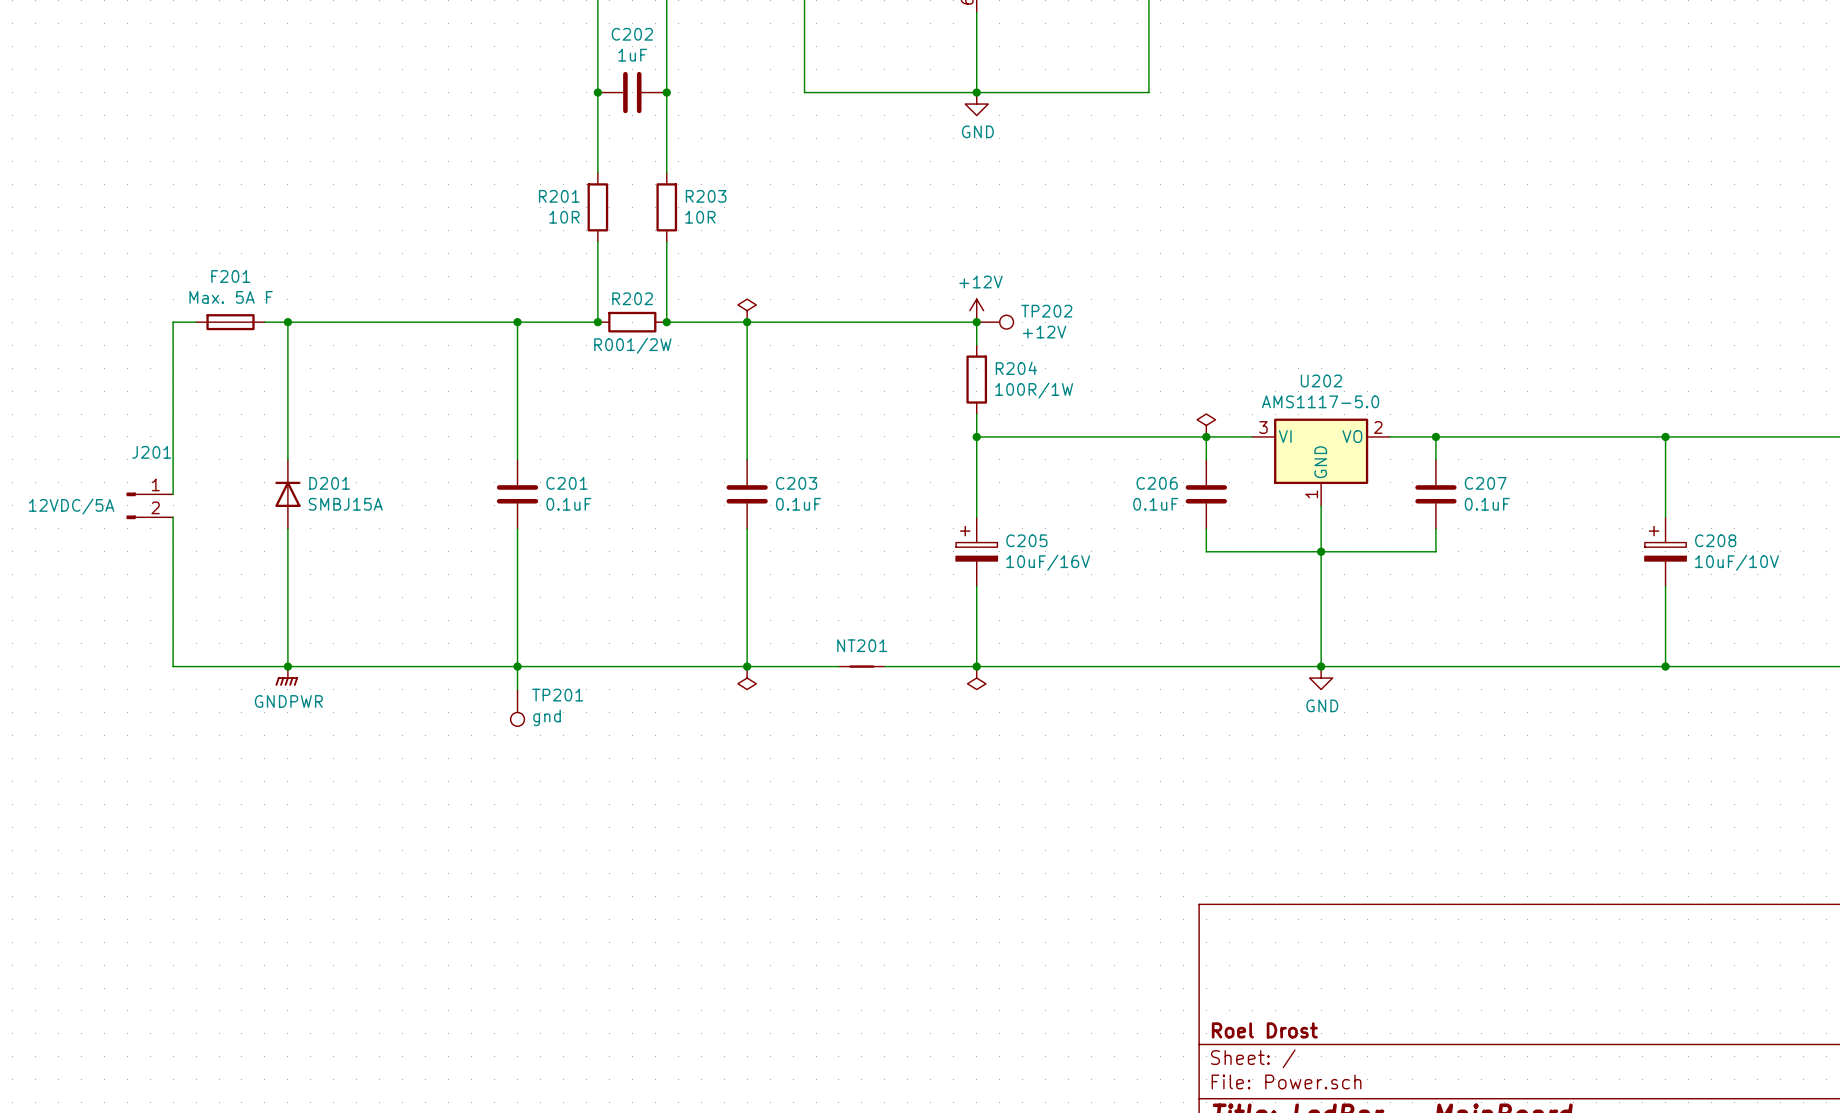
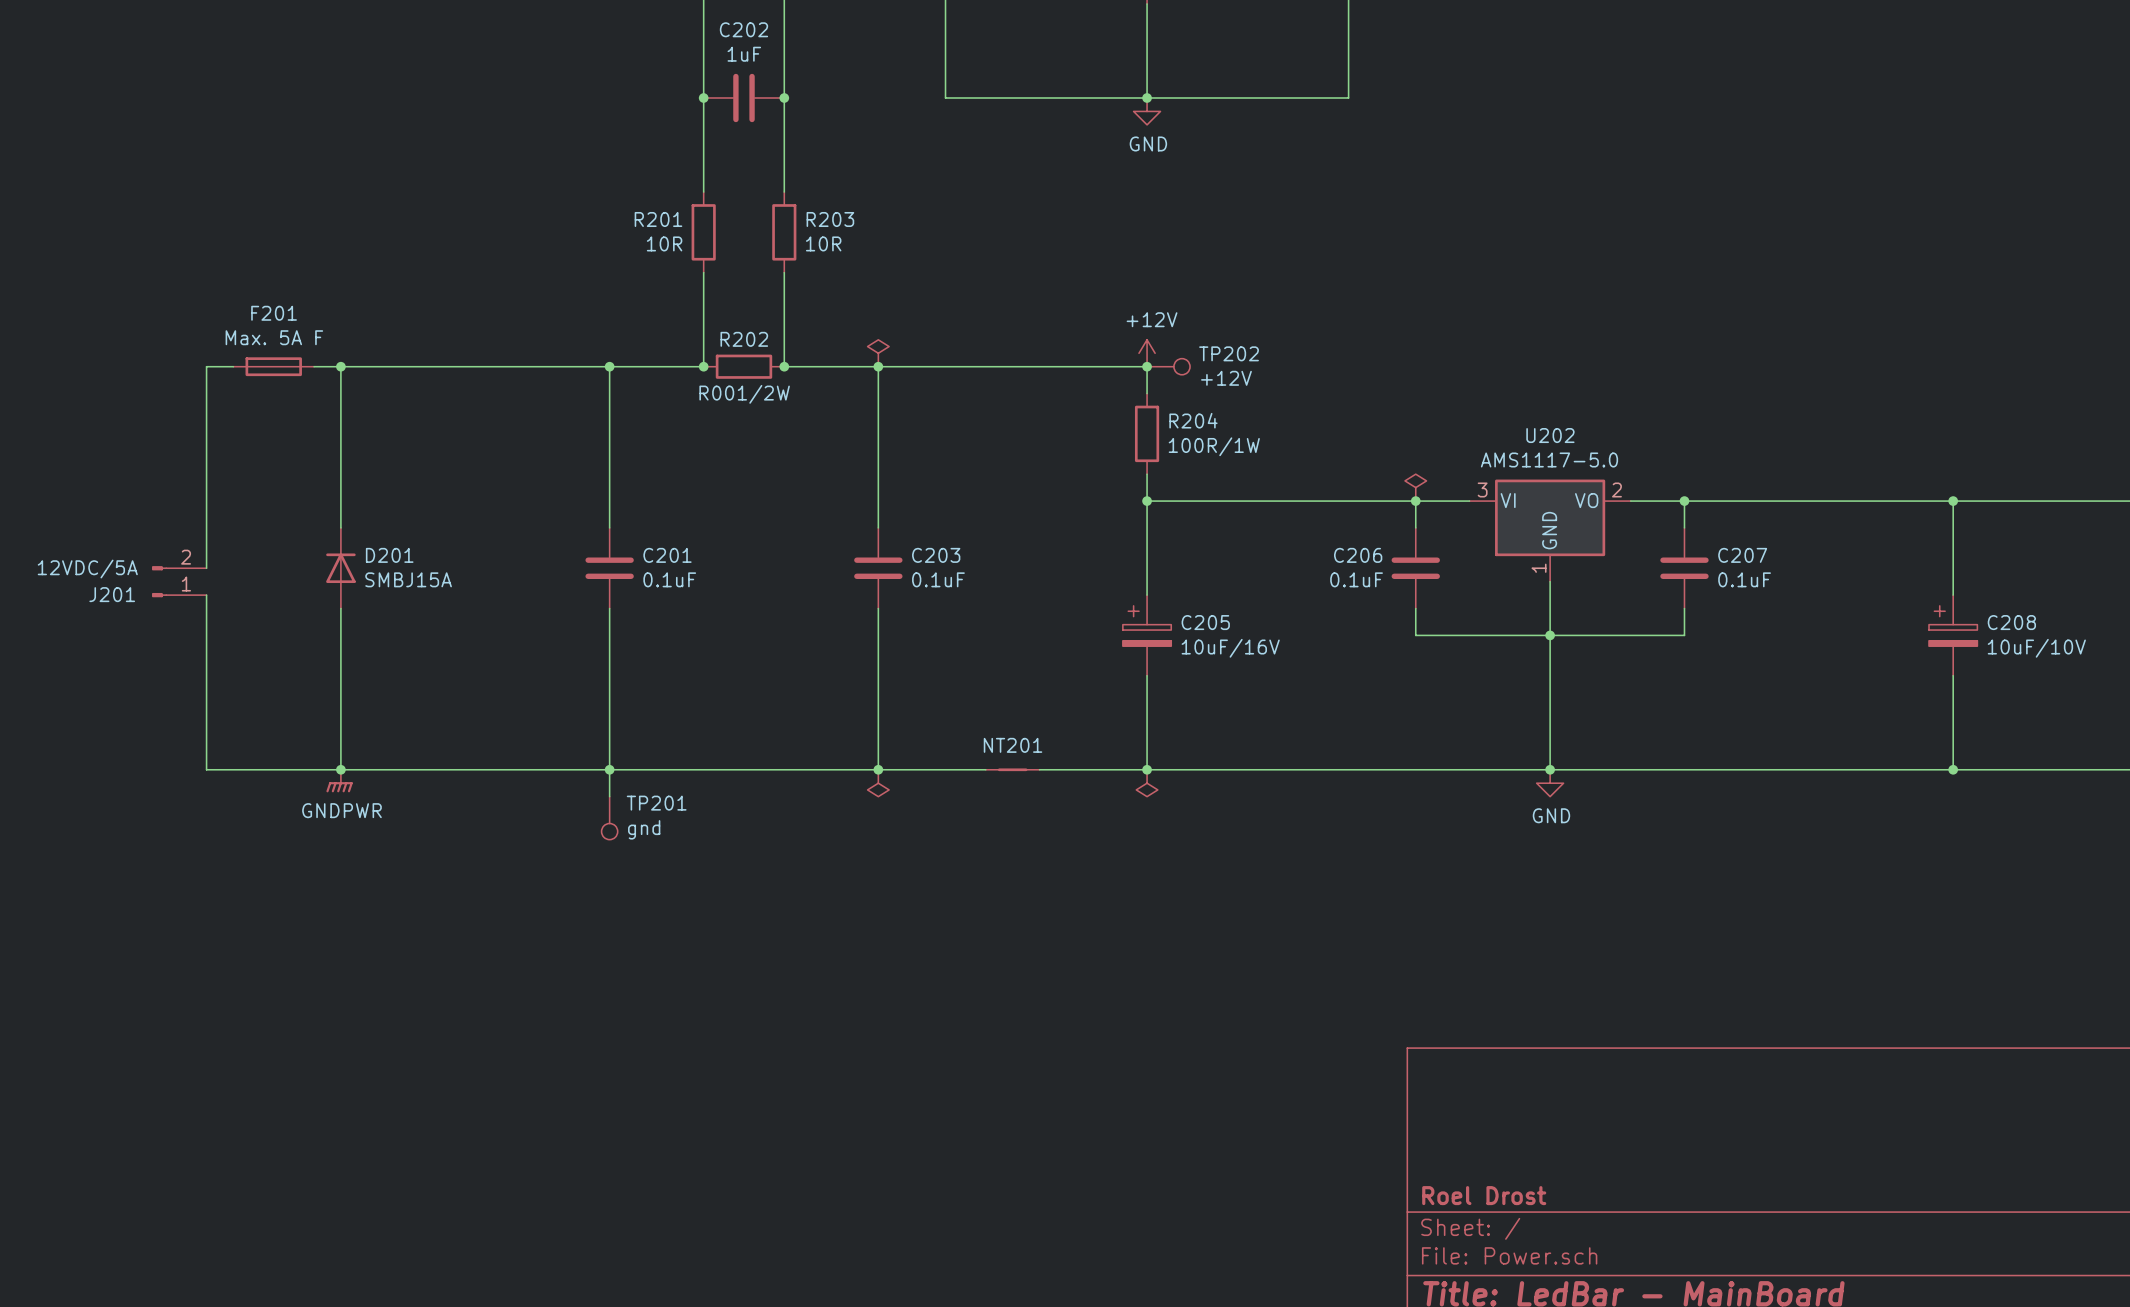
J201 name position: J201 (151, 452) -> J201 (112, 594)
J201 flip: as is (132, 505) -> up-down (159, 581)

